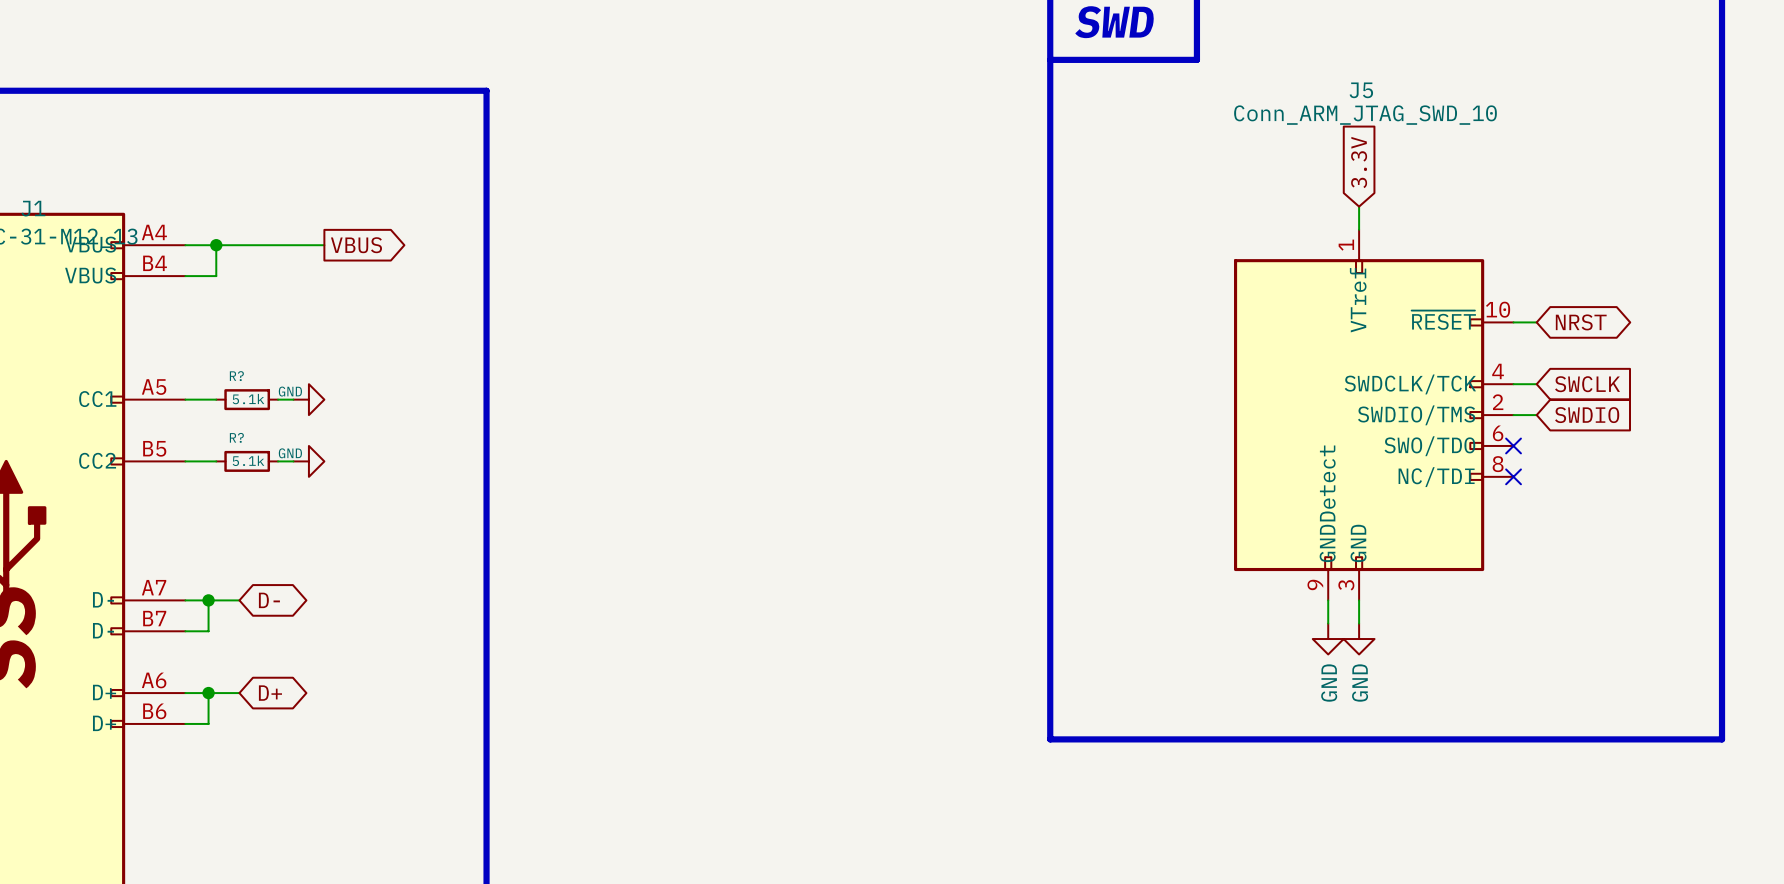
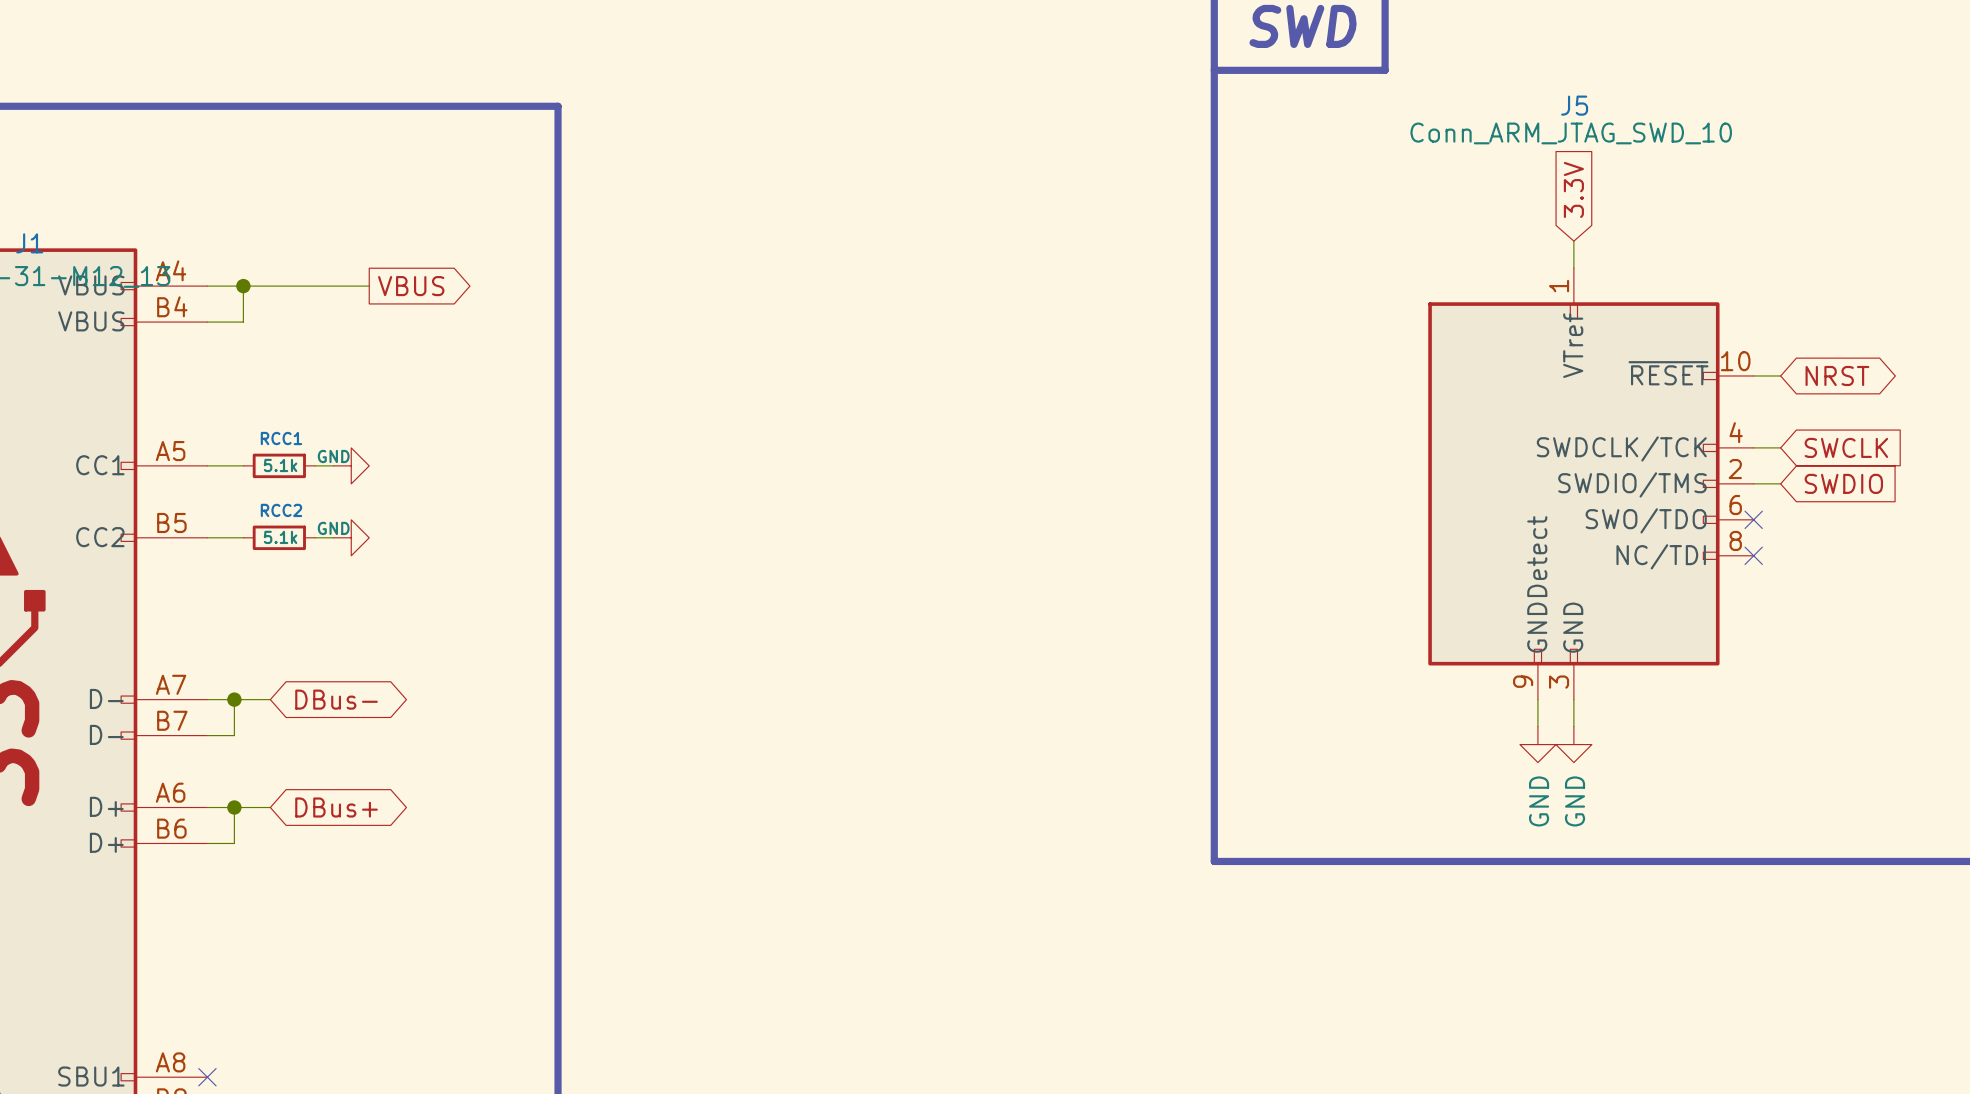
R? name: R? (236, 376) -> RCC1 (281, 438)
R? name: R? (236, 437) -> RCC2 (281, 510)
global label: D- (269, 600) -> DBus- (336, 699)
global label: D+ (270, 693) -> DBus+ (336, 807)

